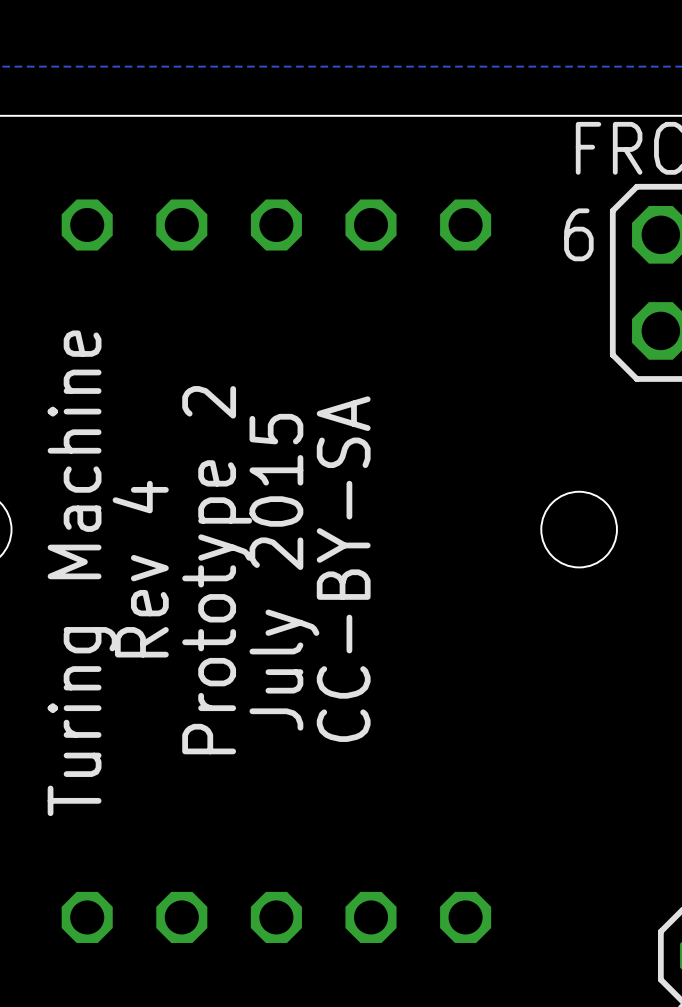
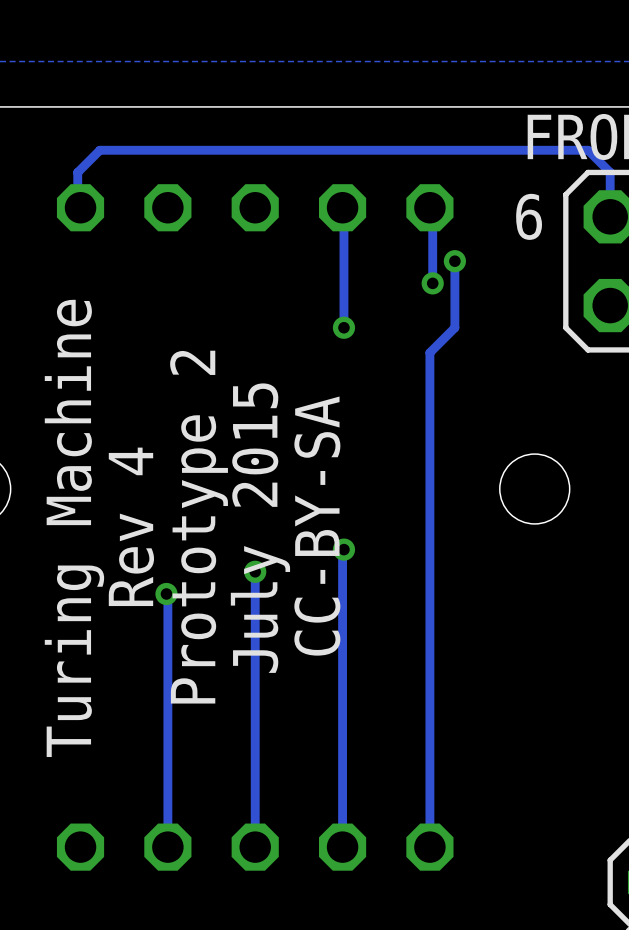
track: none -> (80, 207) (77, 204) (77, 172) (99, 150) (588, 150) (610, 172) (610, 216)
track: none -> (342, 207) (343, 327)
track: none -> (429, 207) (432, 210) (432, 283)
track: none -> (454, 261) (454, 327) (429, 352) (429, 847)
via: none -> (454, 261)
via: none -> (432, 283)
via: none -> (343, 327)
track: none -> (343, 549) (342, 847)
via: none -> (343, 549)
track: none -> (255, 571) (255, 847)
via: none -> (255, 571)
track: none -> (166, 593) (167, 847)
via: none -> (166, 593)

